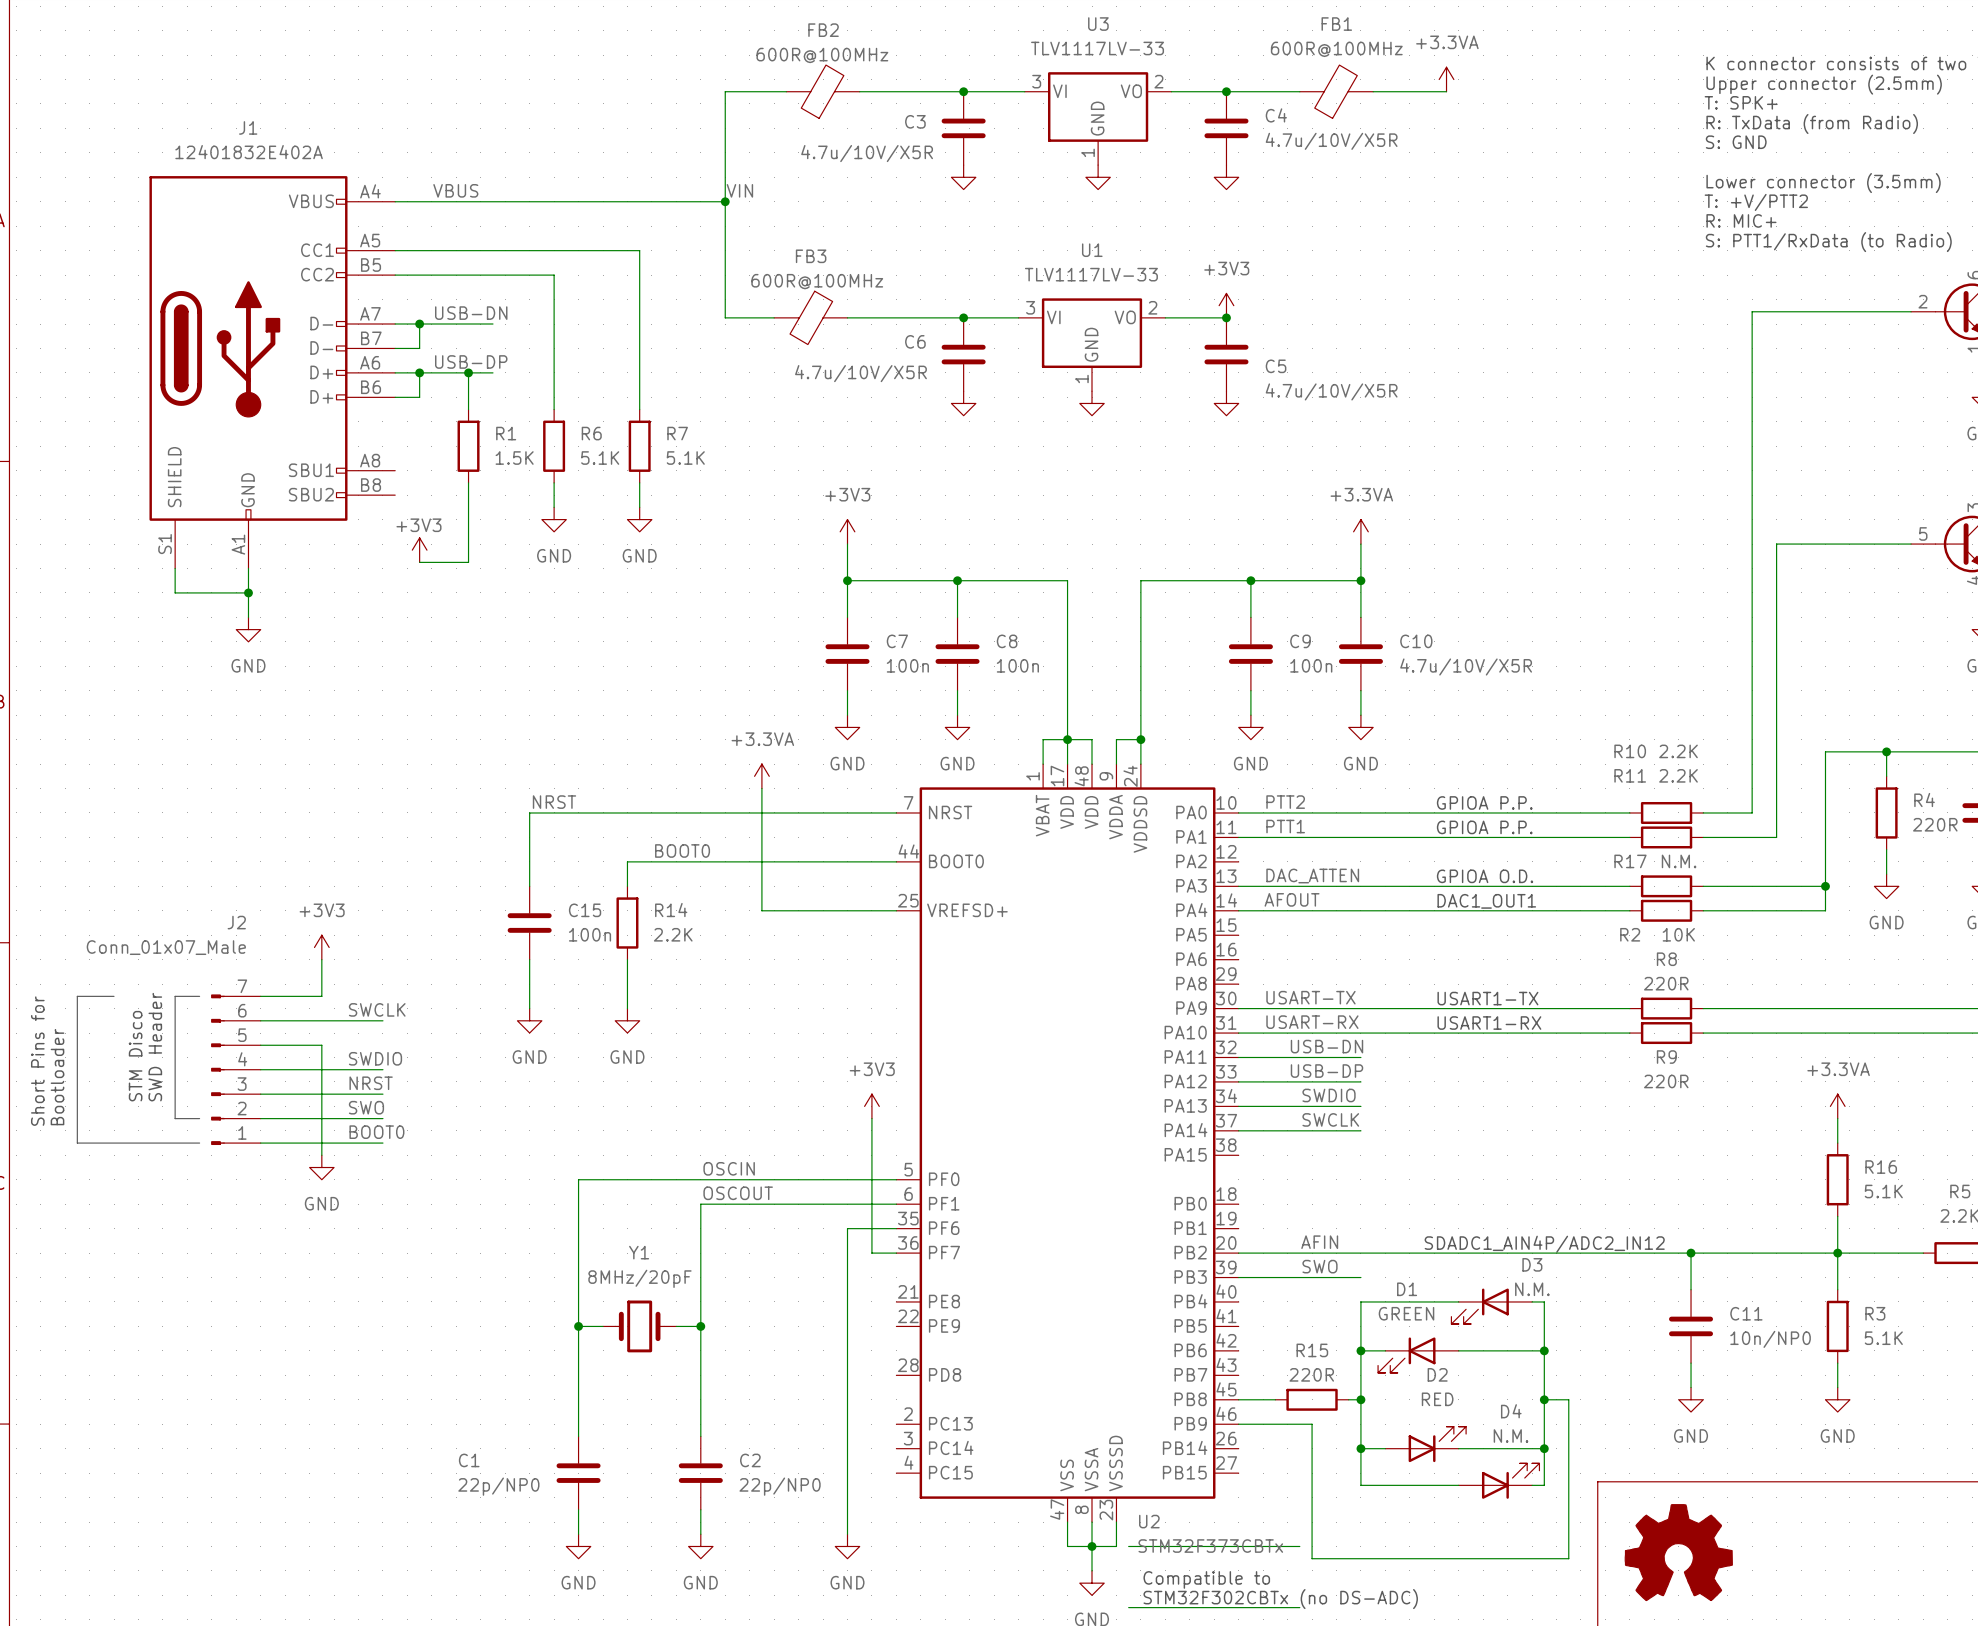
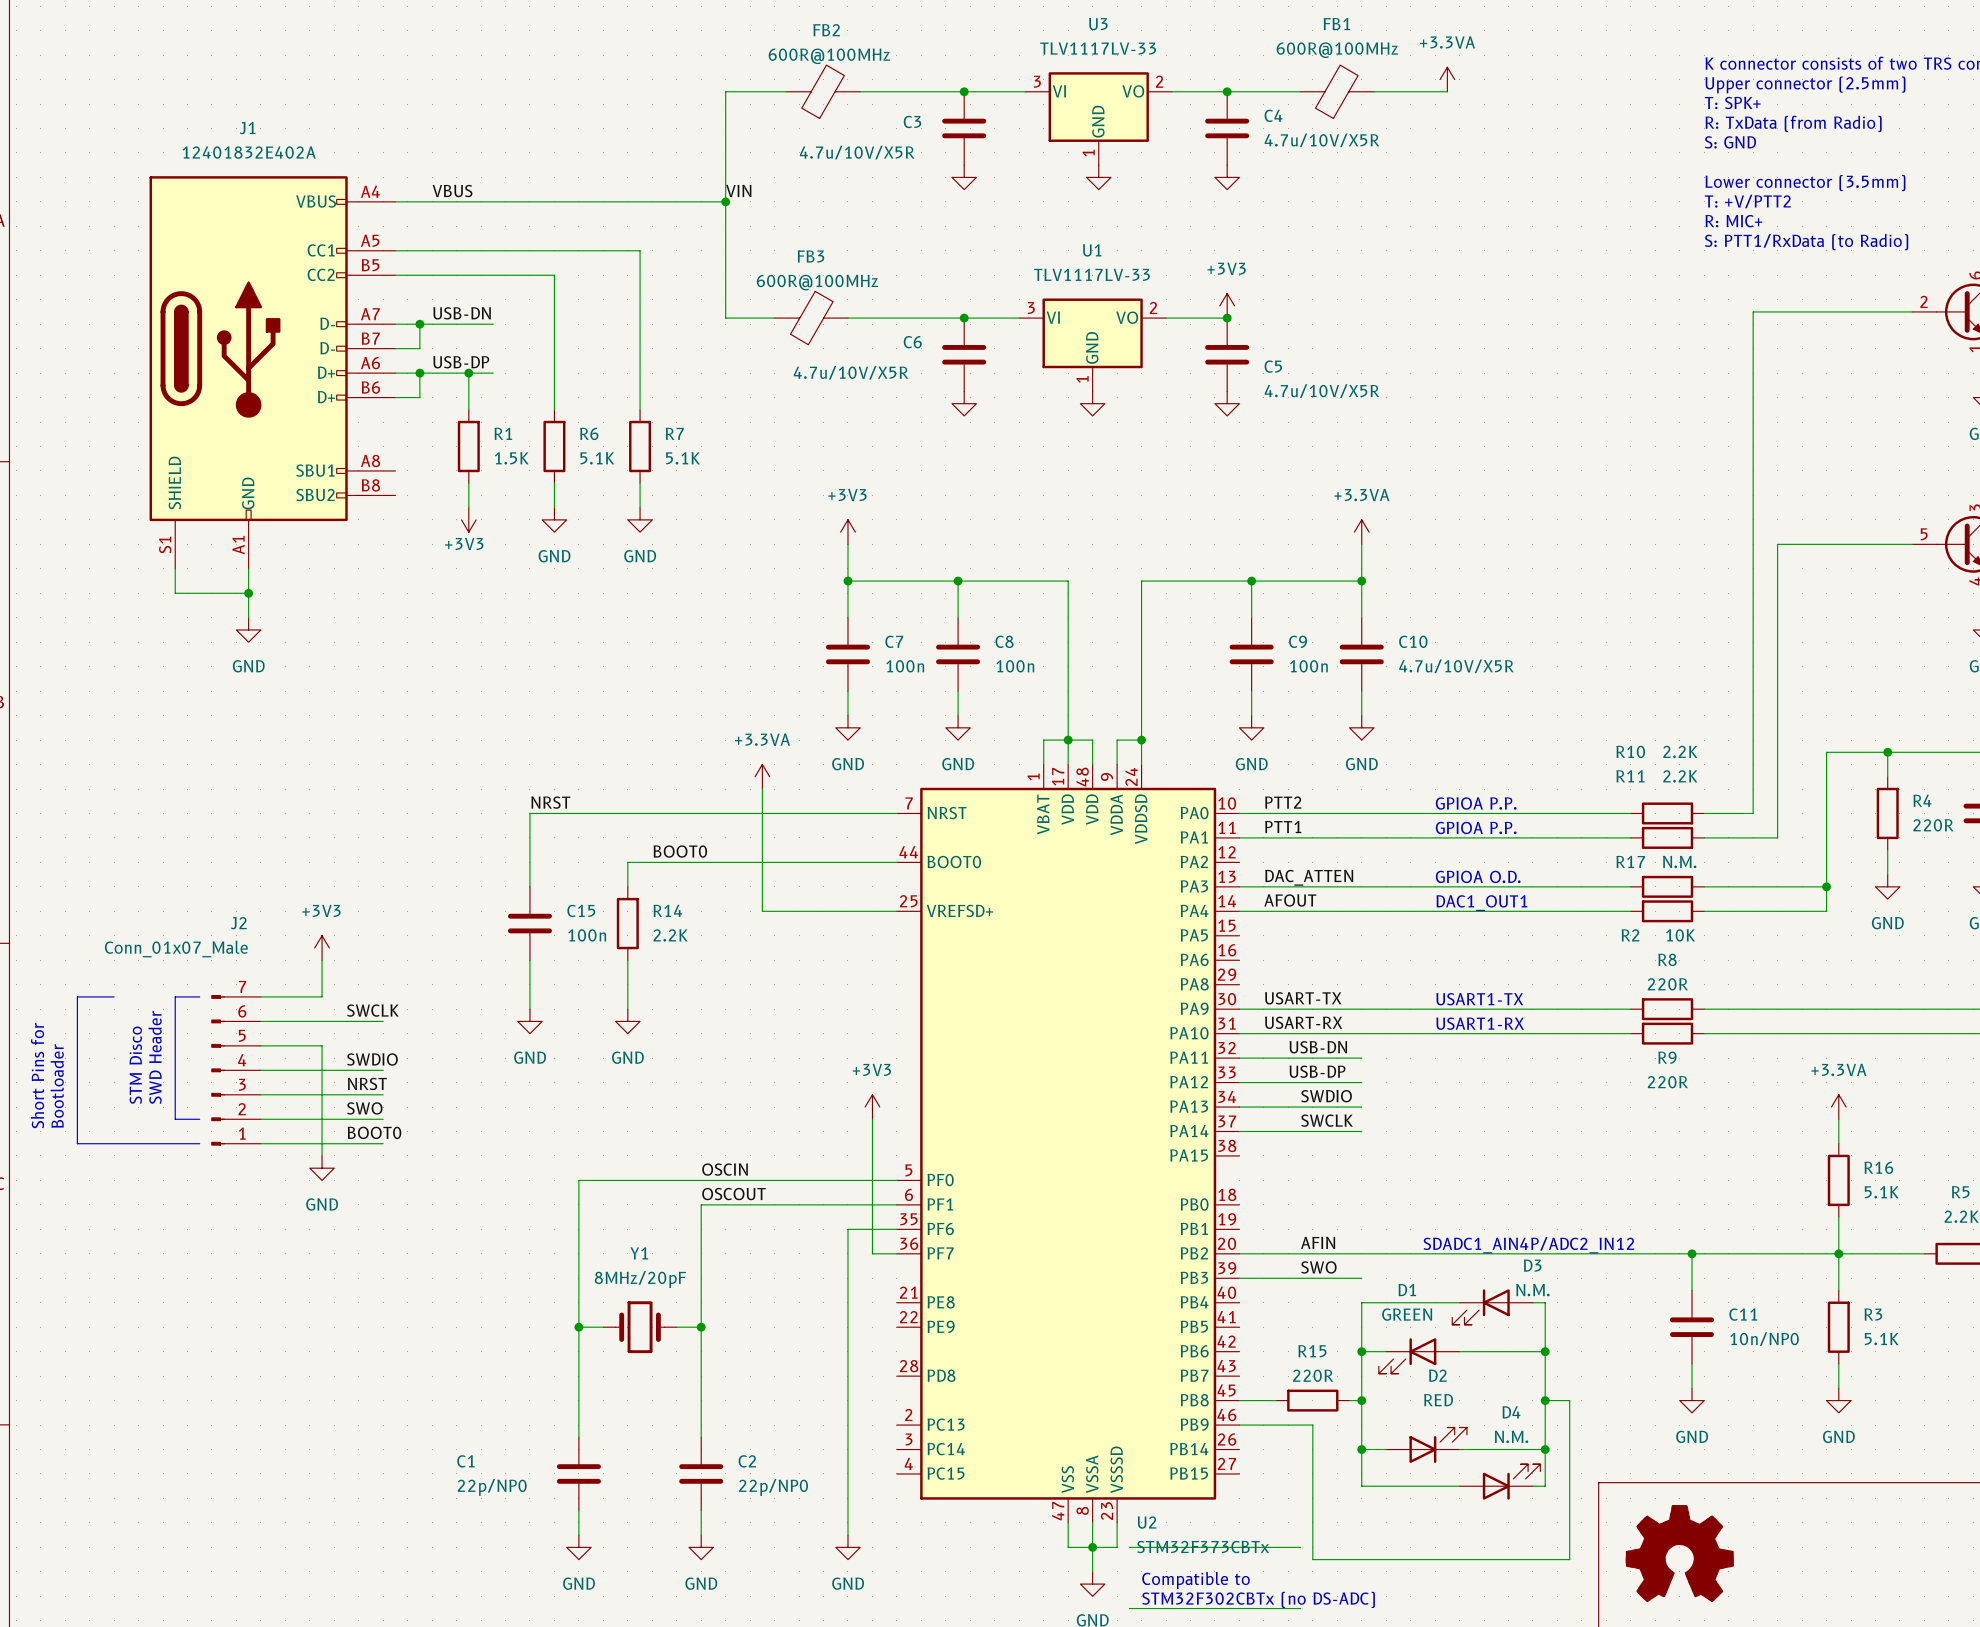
wire: (468, 507) (468, 562) (419, 562) -> none
power symbol rotation: 0° (419, 550) -> 180° (468, 519)
power symbol position: +3V3 (419, 550) -> +3V3 (468, 519)

